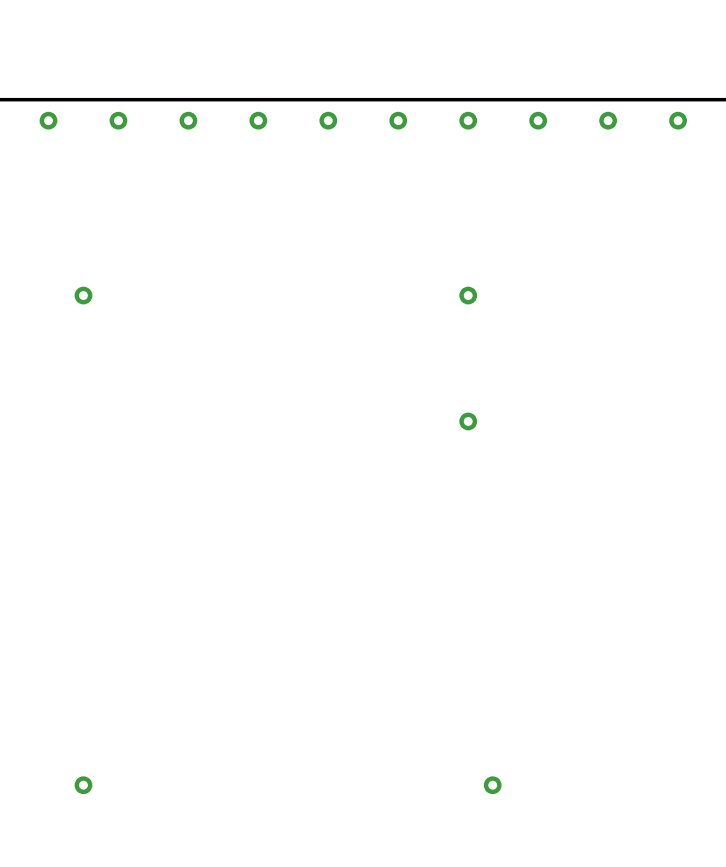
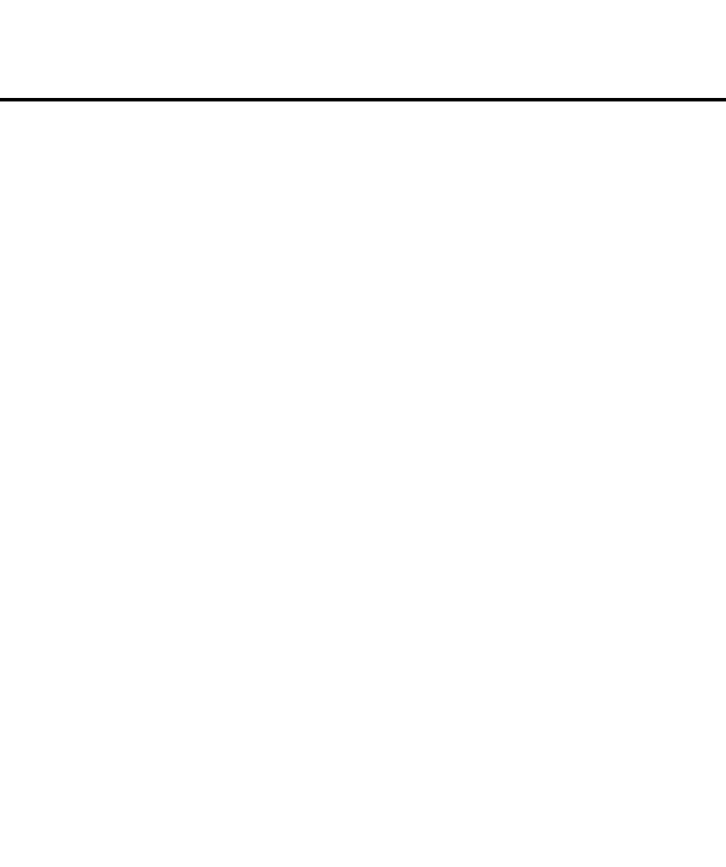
via: (48, 120) -> none
via: (118, 120) -> none
via: (188, 120) -> none
via: (258, 120) -> none
via: (328, 120) -> none
via: (398, 120) -> none
via: (468, 120) -> none
via: (538, 120) -> none
via: (608, 120) -> none
via: (678, 120) -> none
via: (83, 295) -> none
via: (468, 295) -> none
via: (468, 421) -> none
via: (83, 785) -> none
via: (492, 785) -> none

